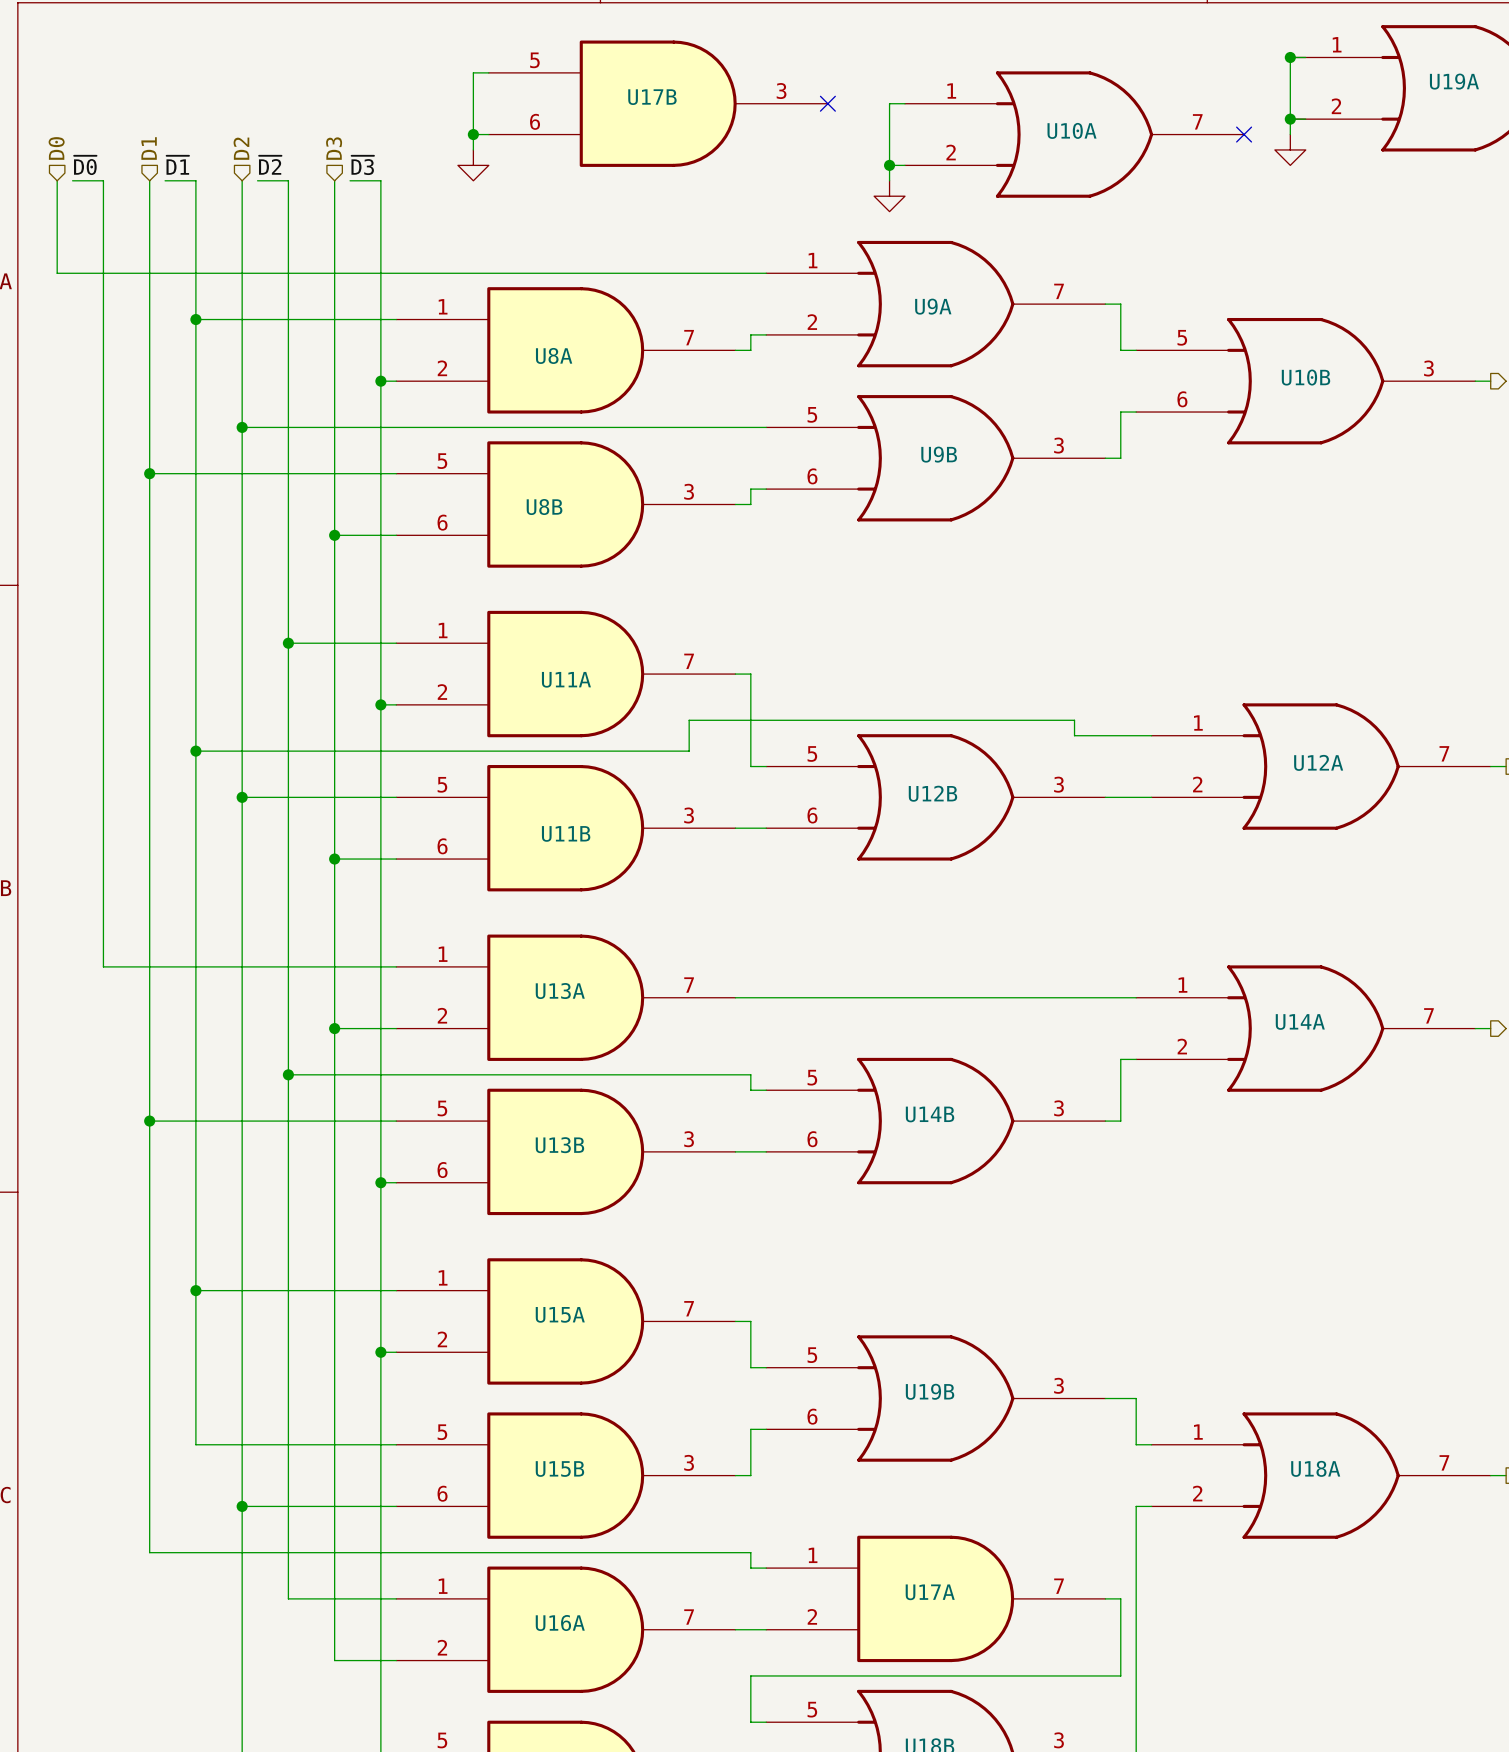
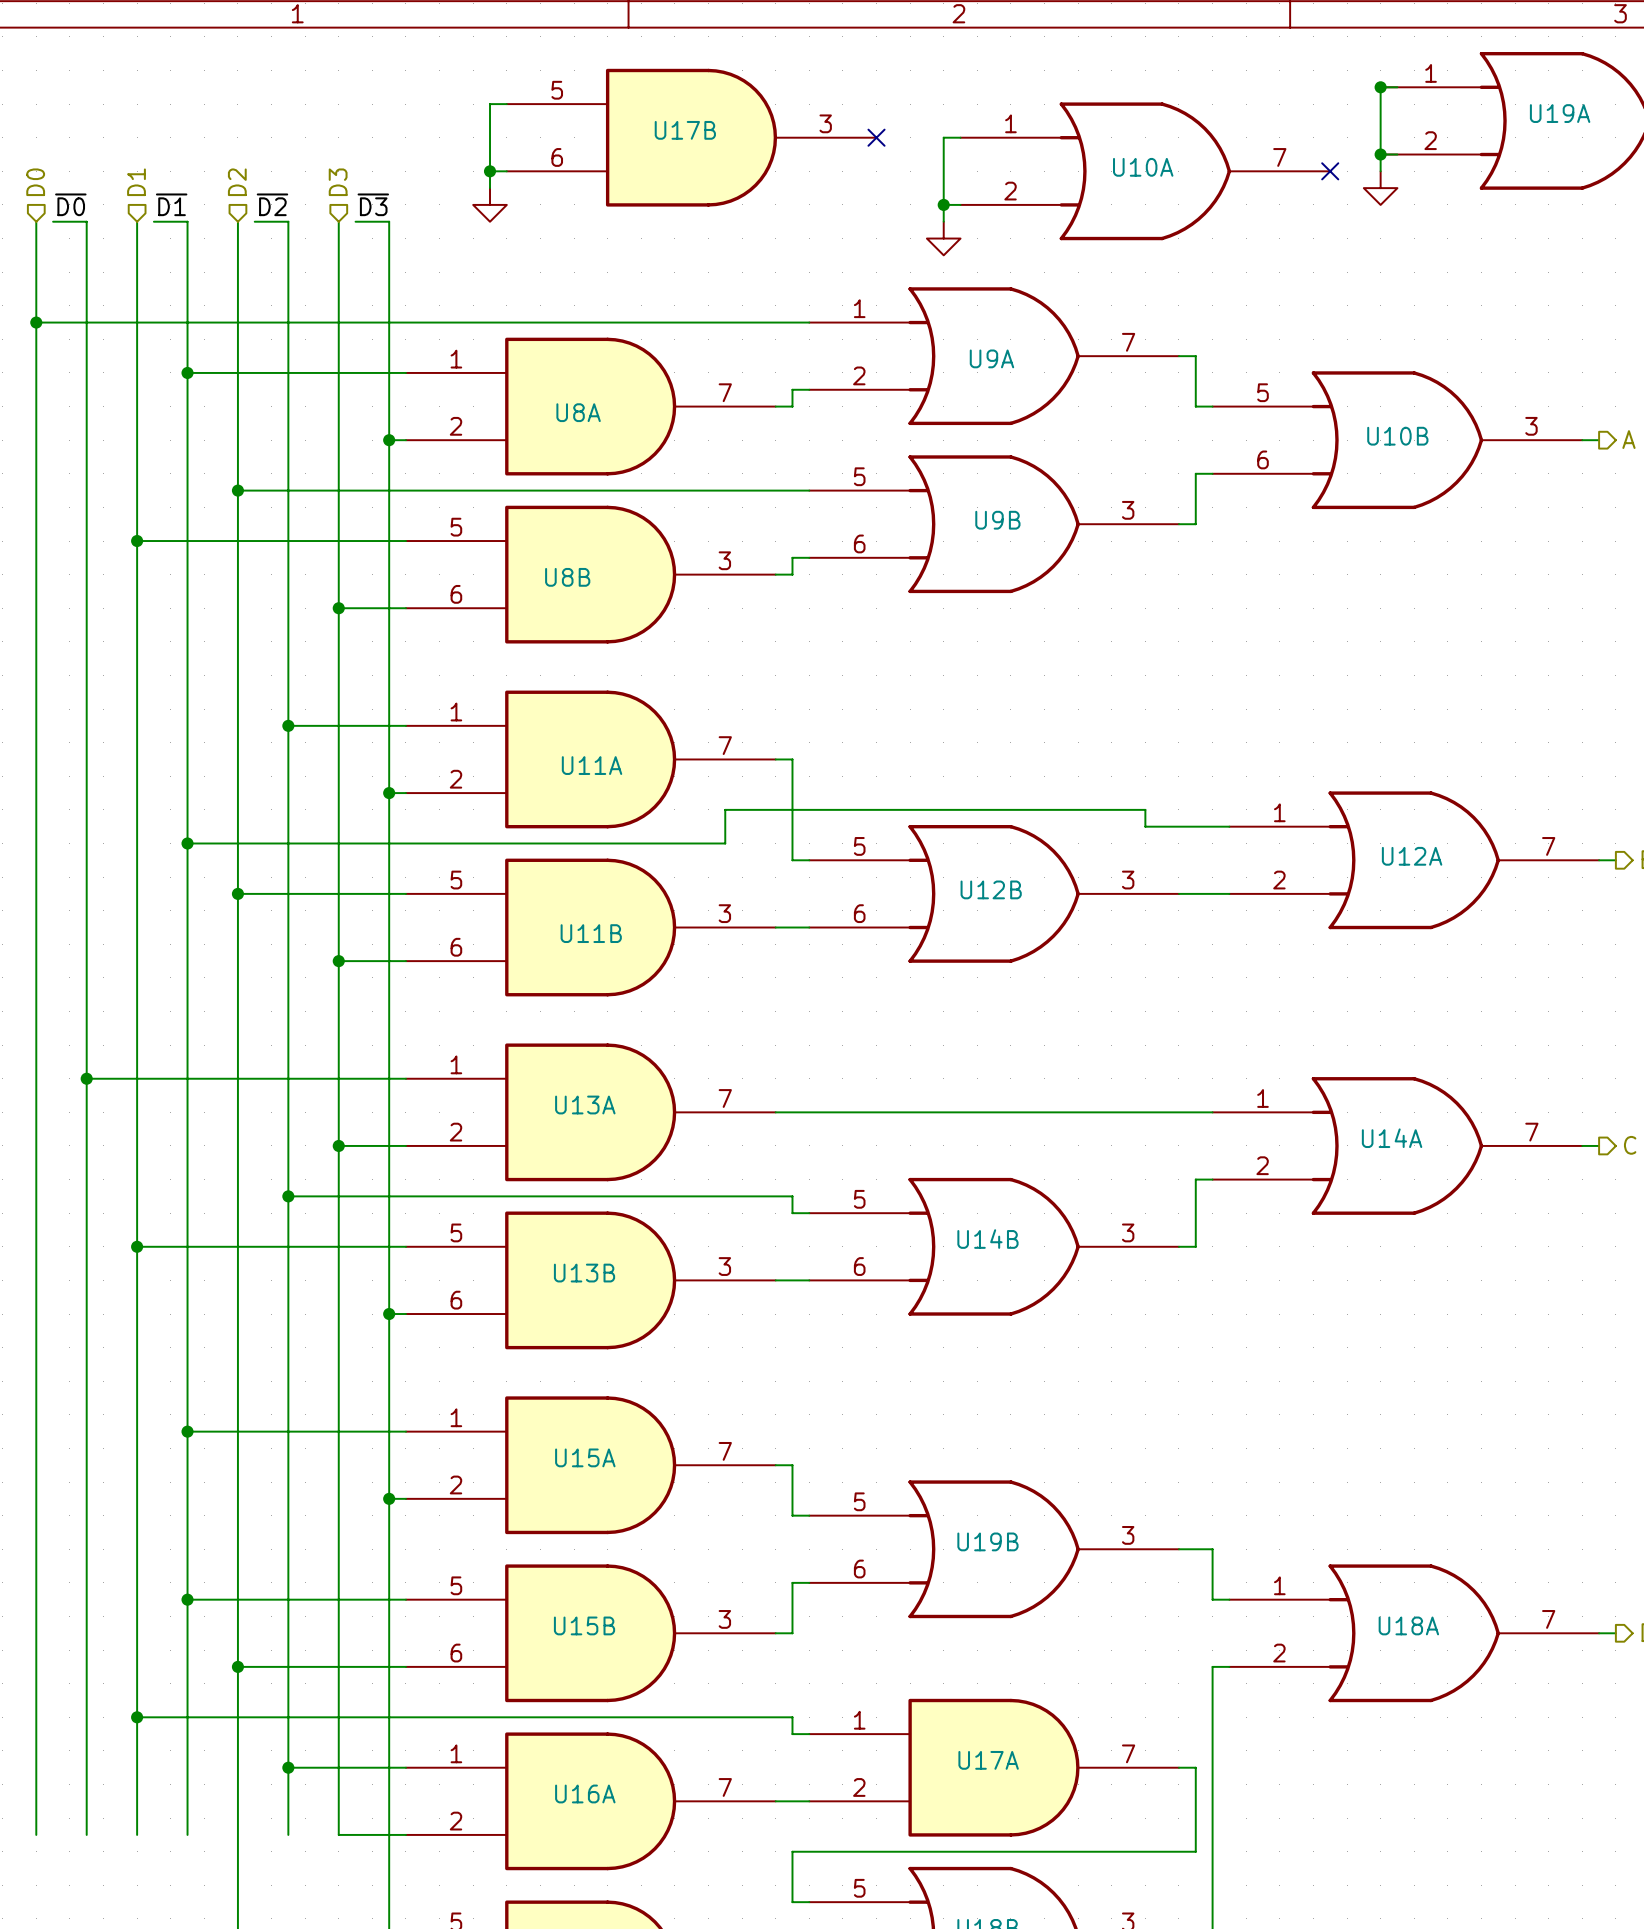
wire: none -> (36, 322) (36, 1834)
junction: none -> (36, 322)
wire: none -> (86, 1078) (86, 1834)
junction: none -> (86, 1078)
wire: none -> (187, 1599) (187, 1834)
junction: none -> (187, 1599)
wire: none -> (137, 1717) (137, 1834)
junction: none -> (137, 1717)
wire: none -> (288, 1767) (288, 1834)
junction: none -> (288, 1767)

